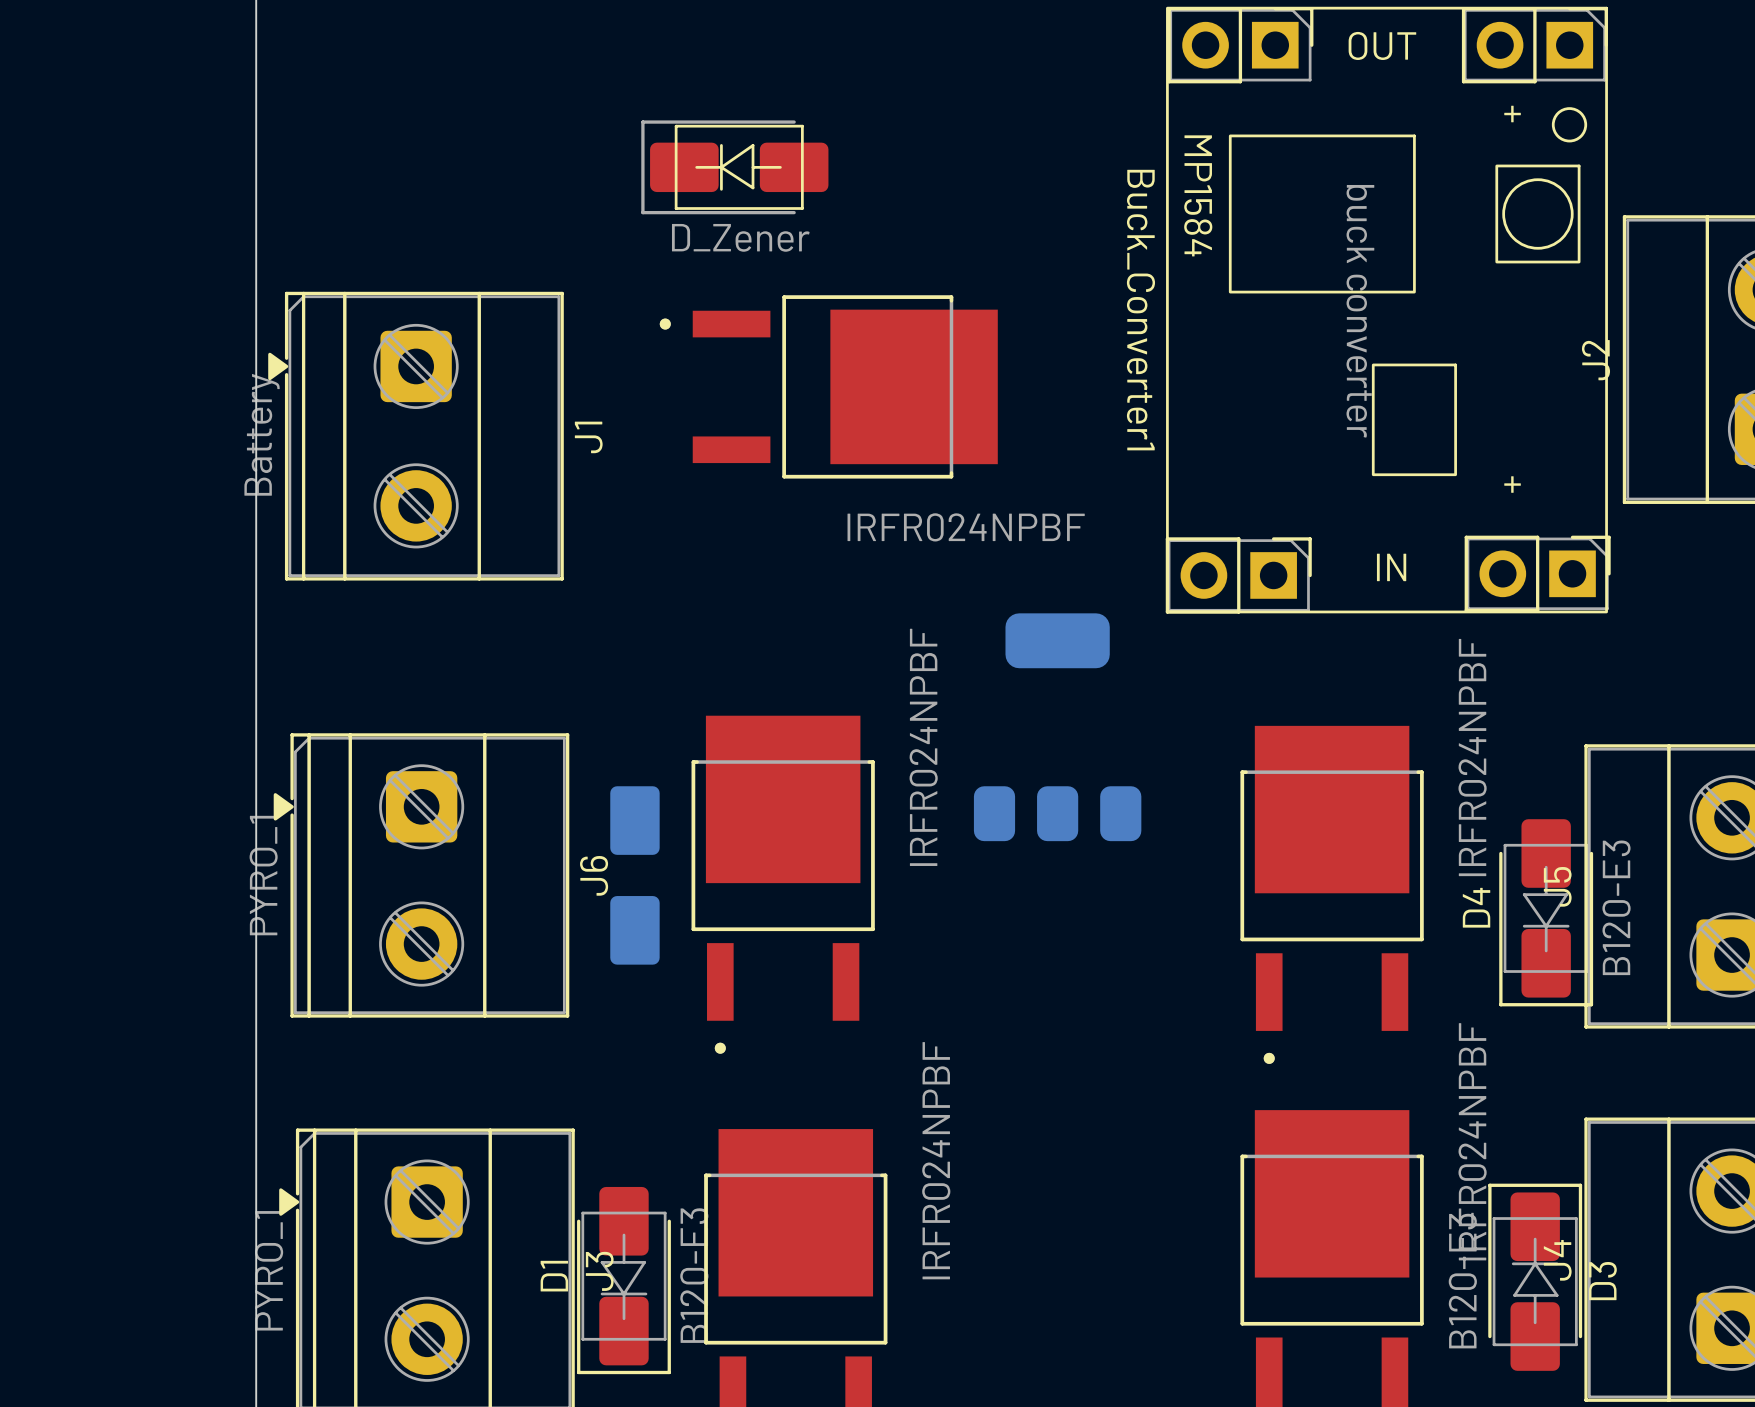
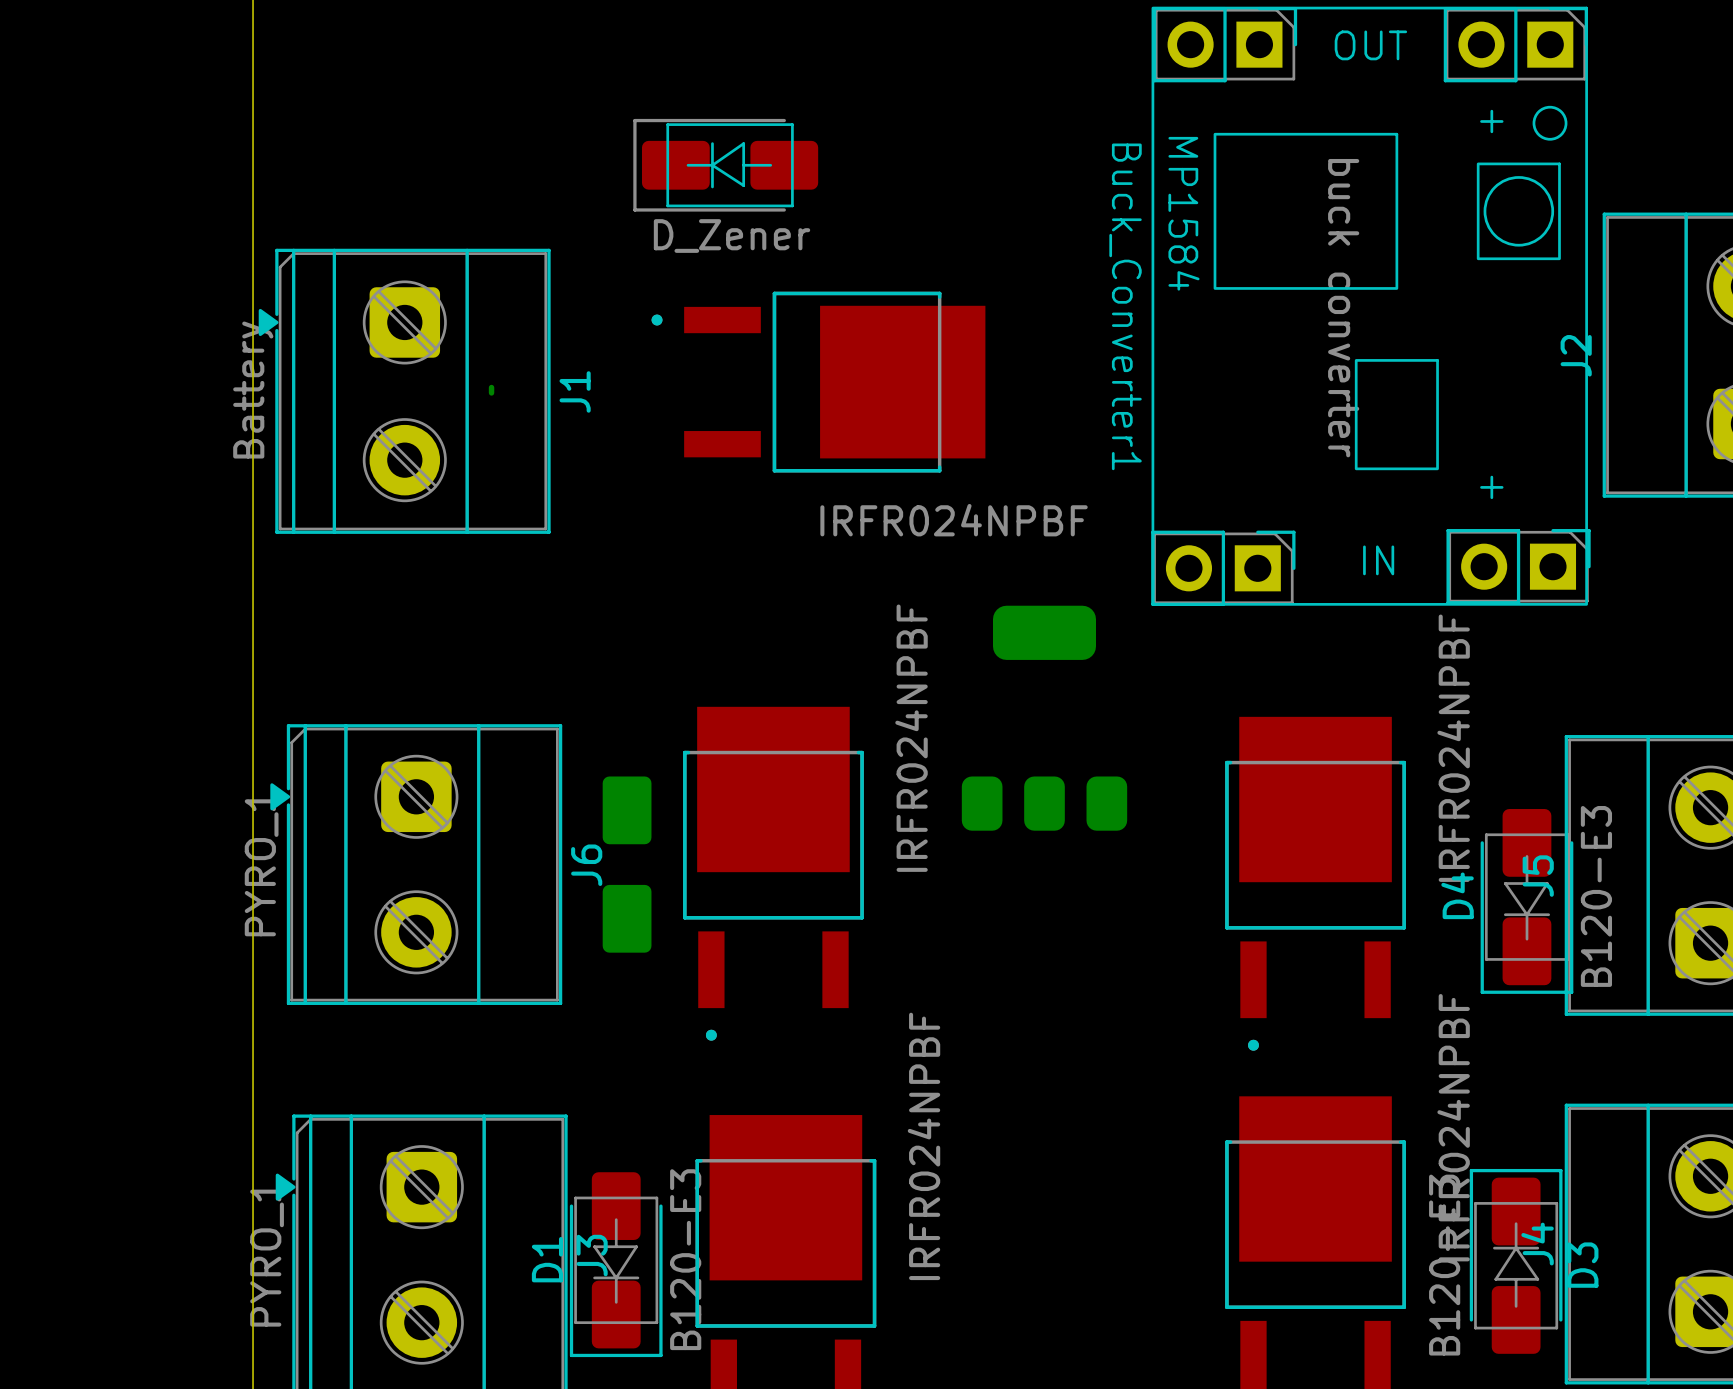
bottom track: none -> (491, 387) (491, 392)
J1 position: (416, 436) -> (404, 391)

